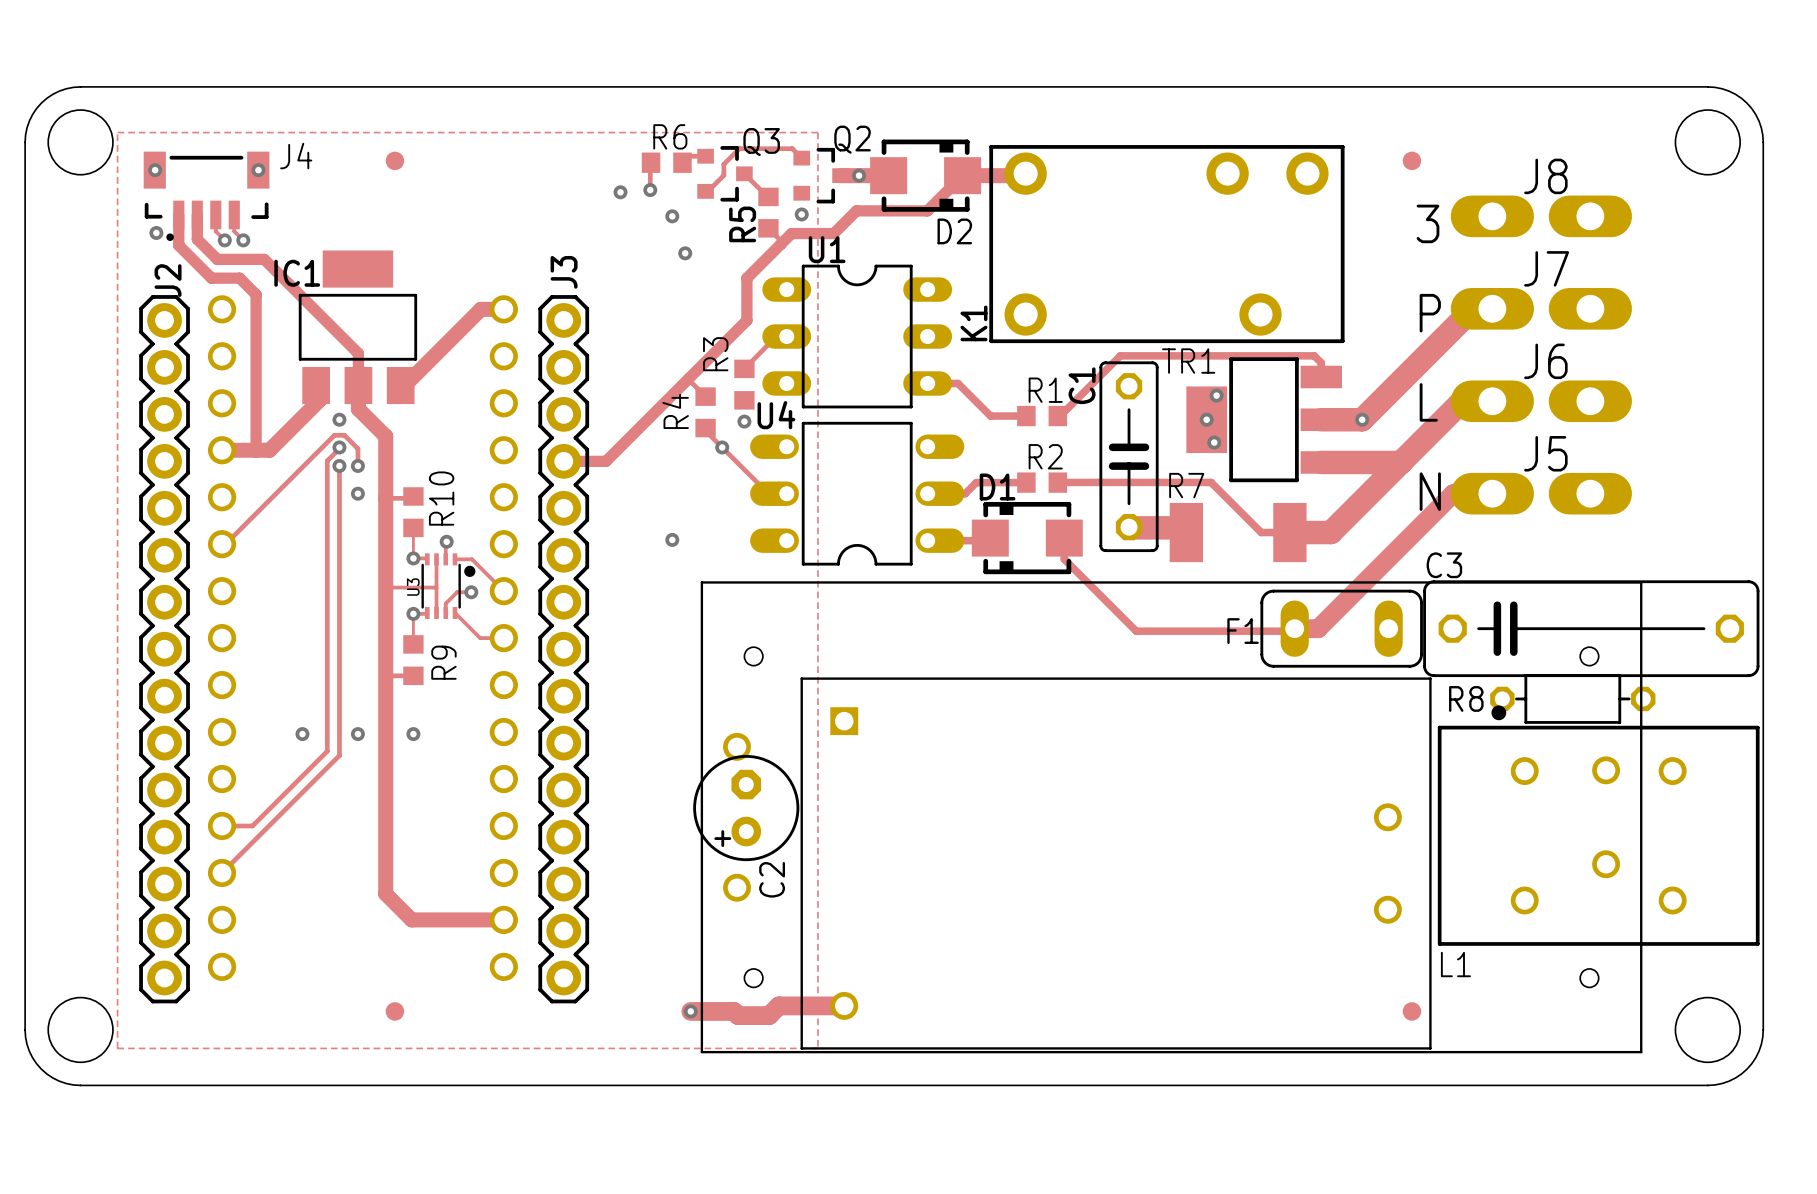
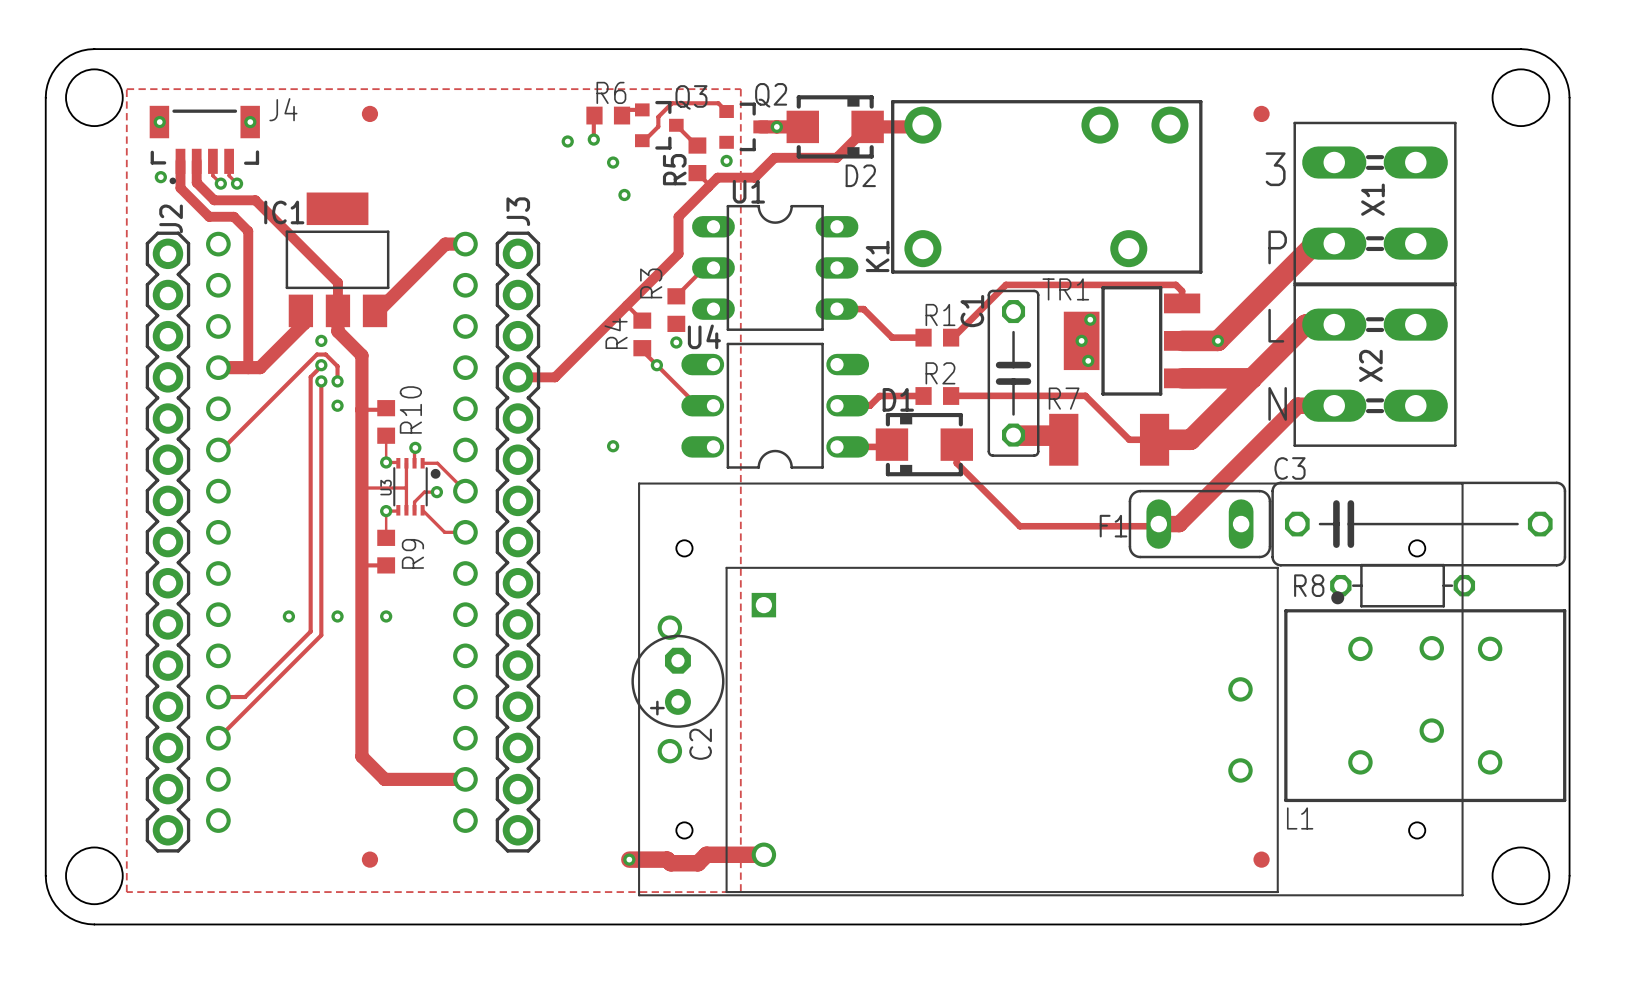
J8: (1541, 216) -> none
X1: none -> (1375, 203)
J7: (1541, 308) -> none
J6: (1541, 401) -> none
X2: none -> (1375, 365)
J5: (1541, 493) -> none

